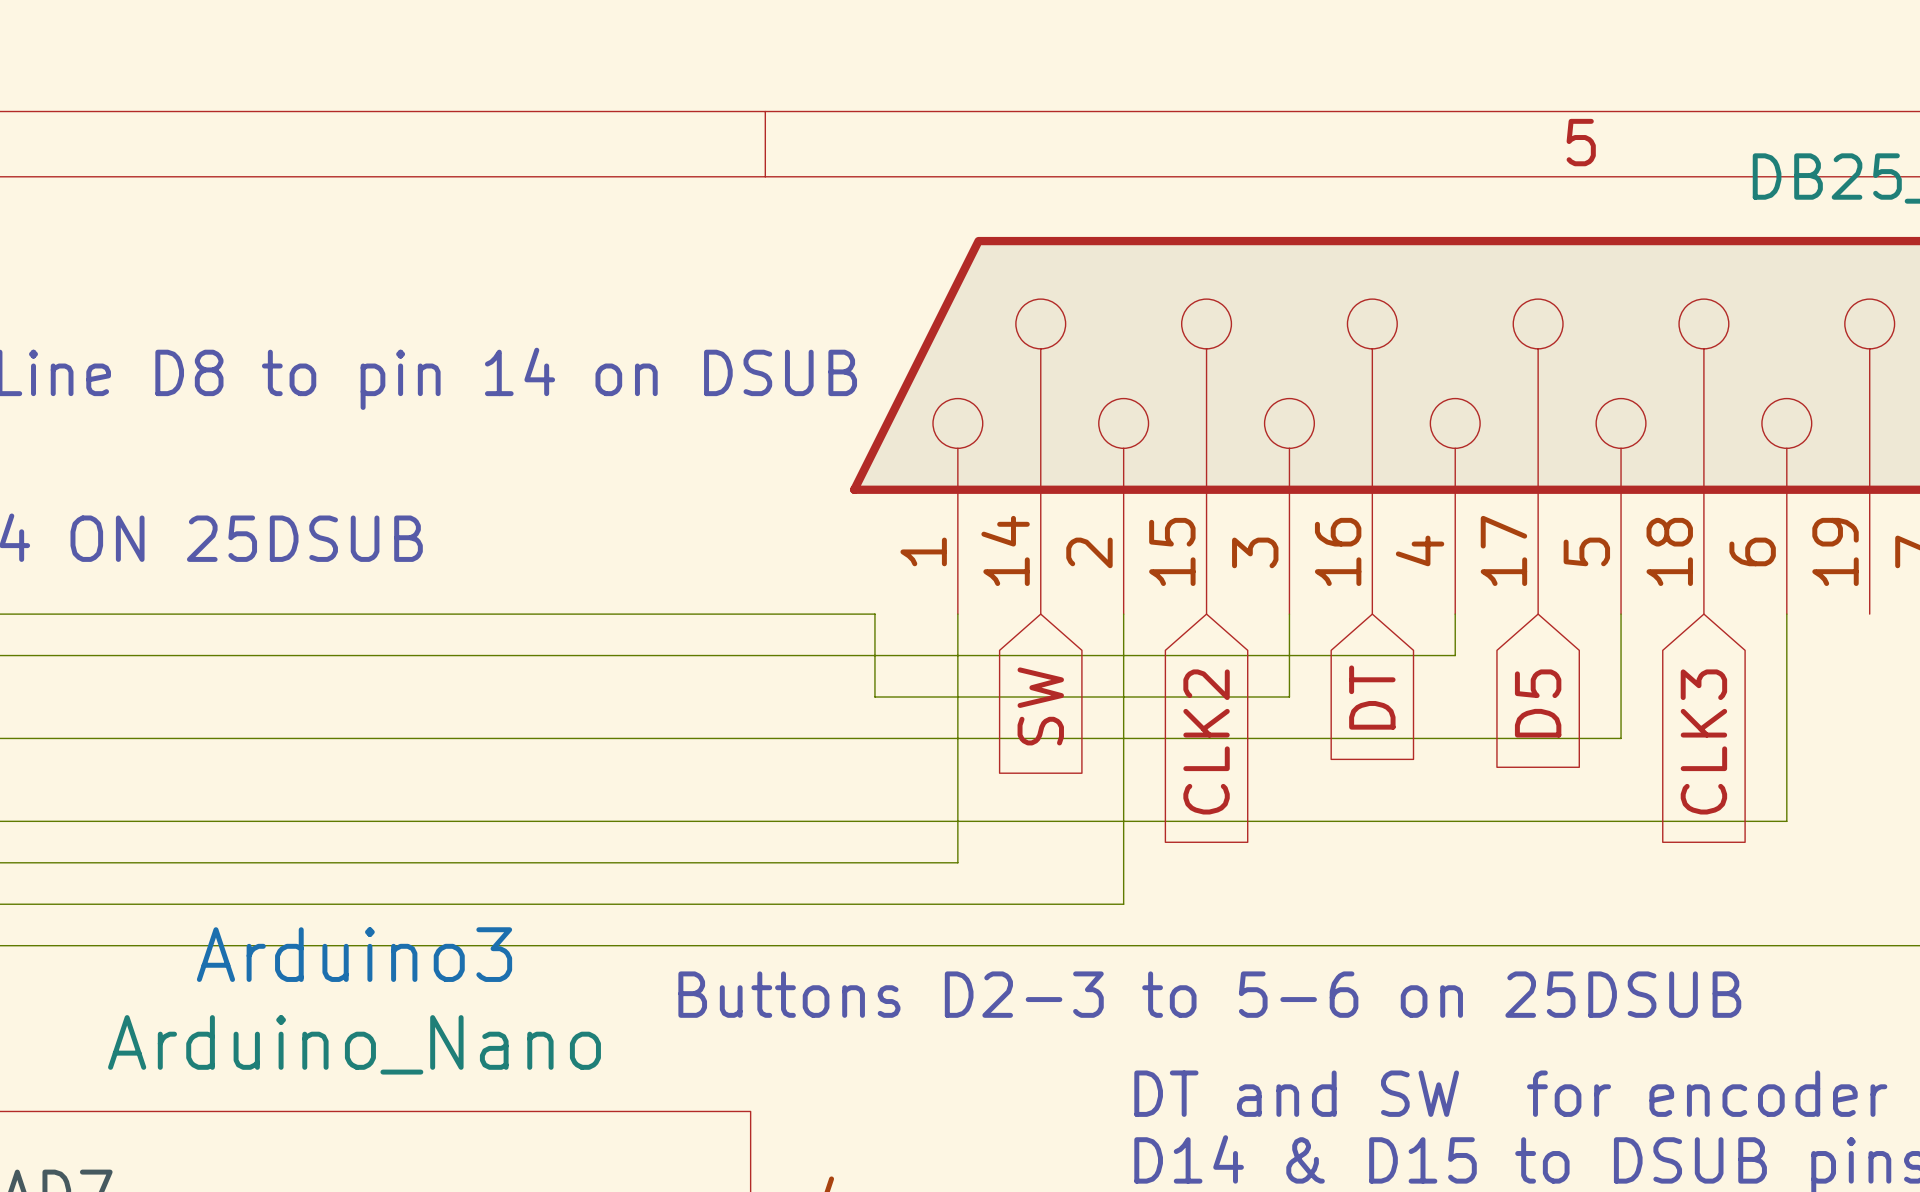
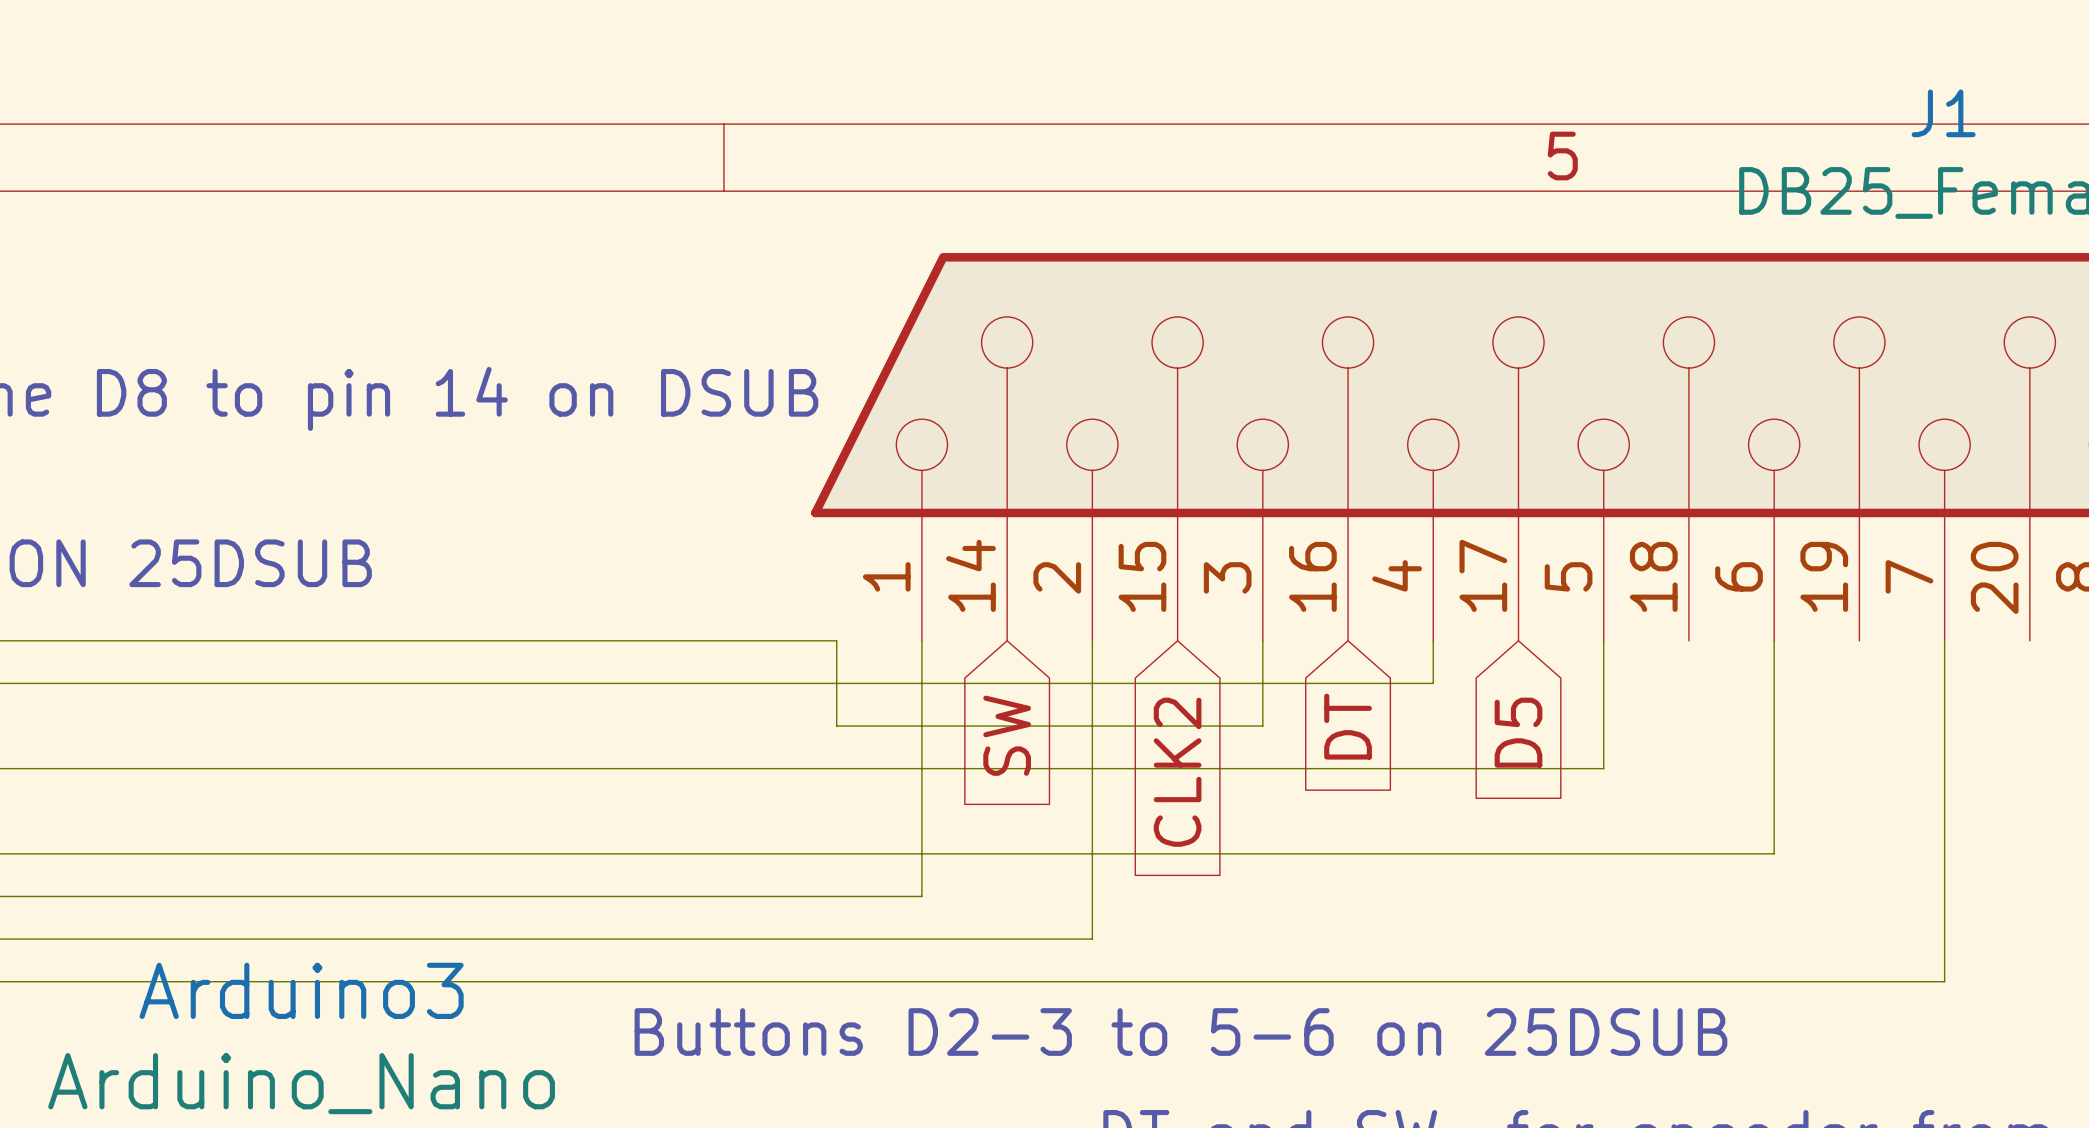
global label: CLK3 (1703, 741) -> none

